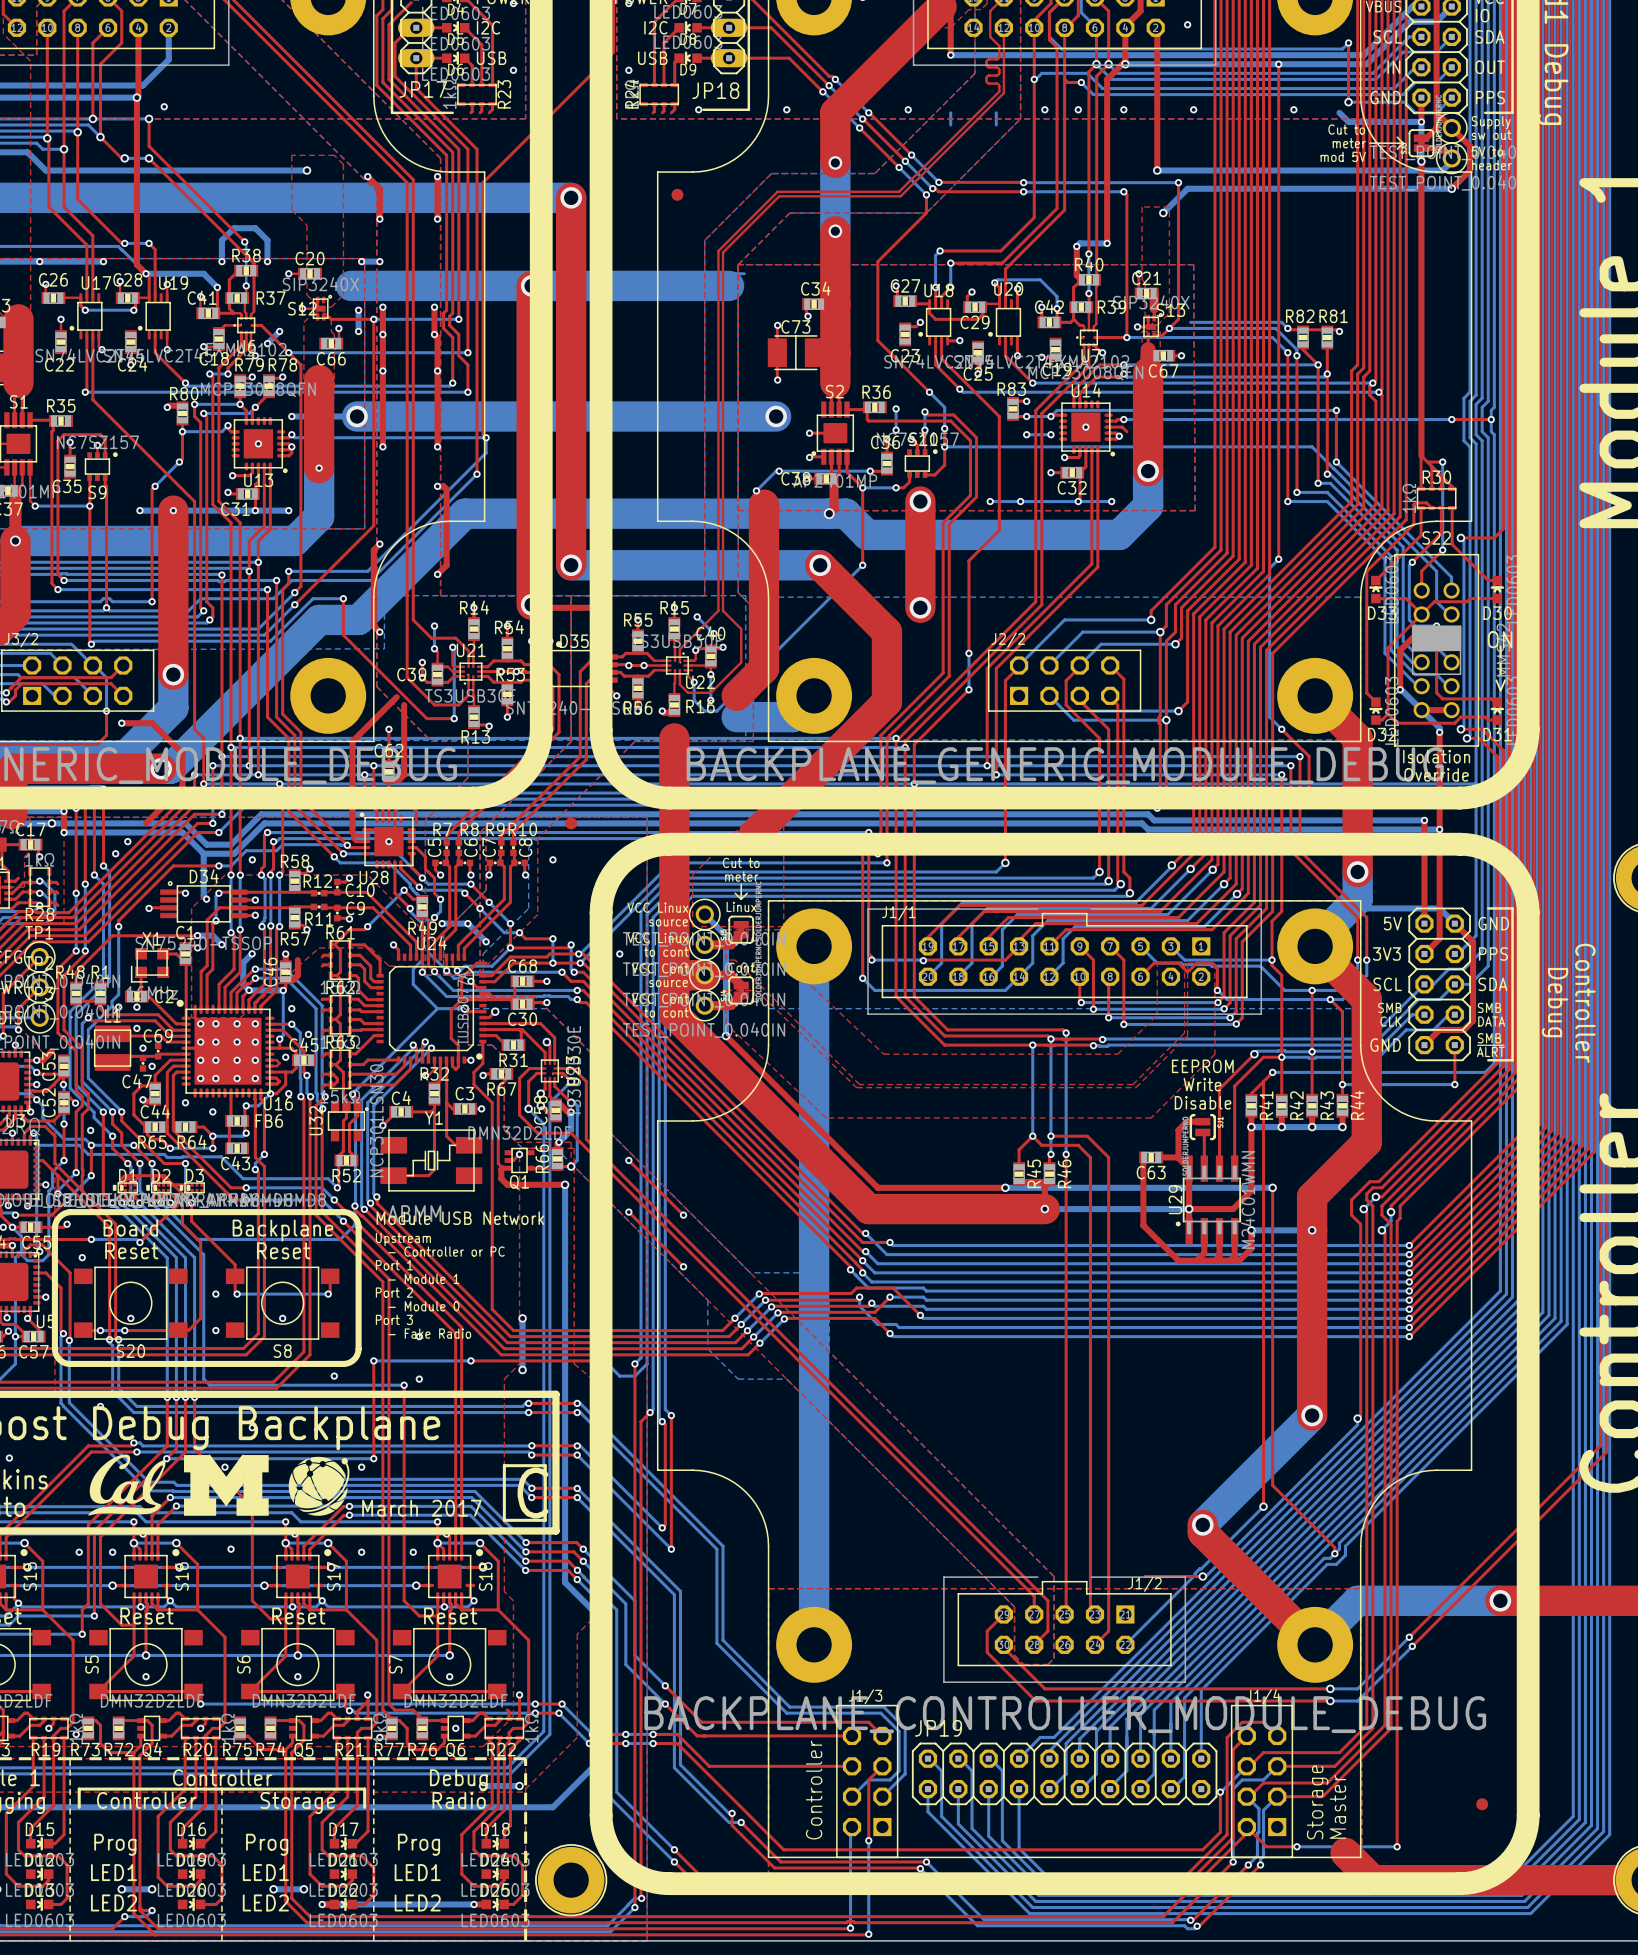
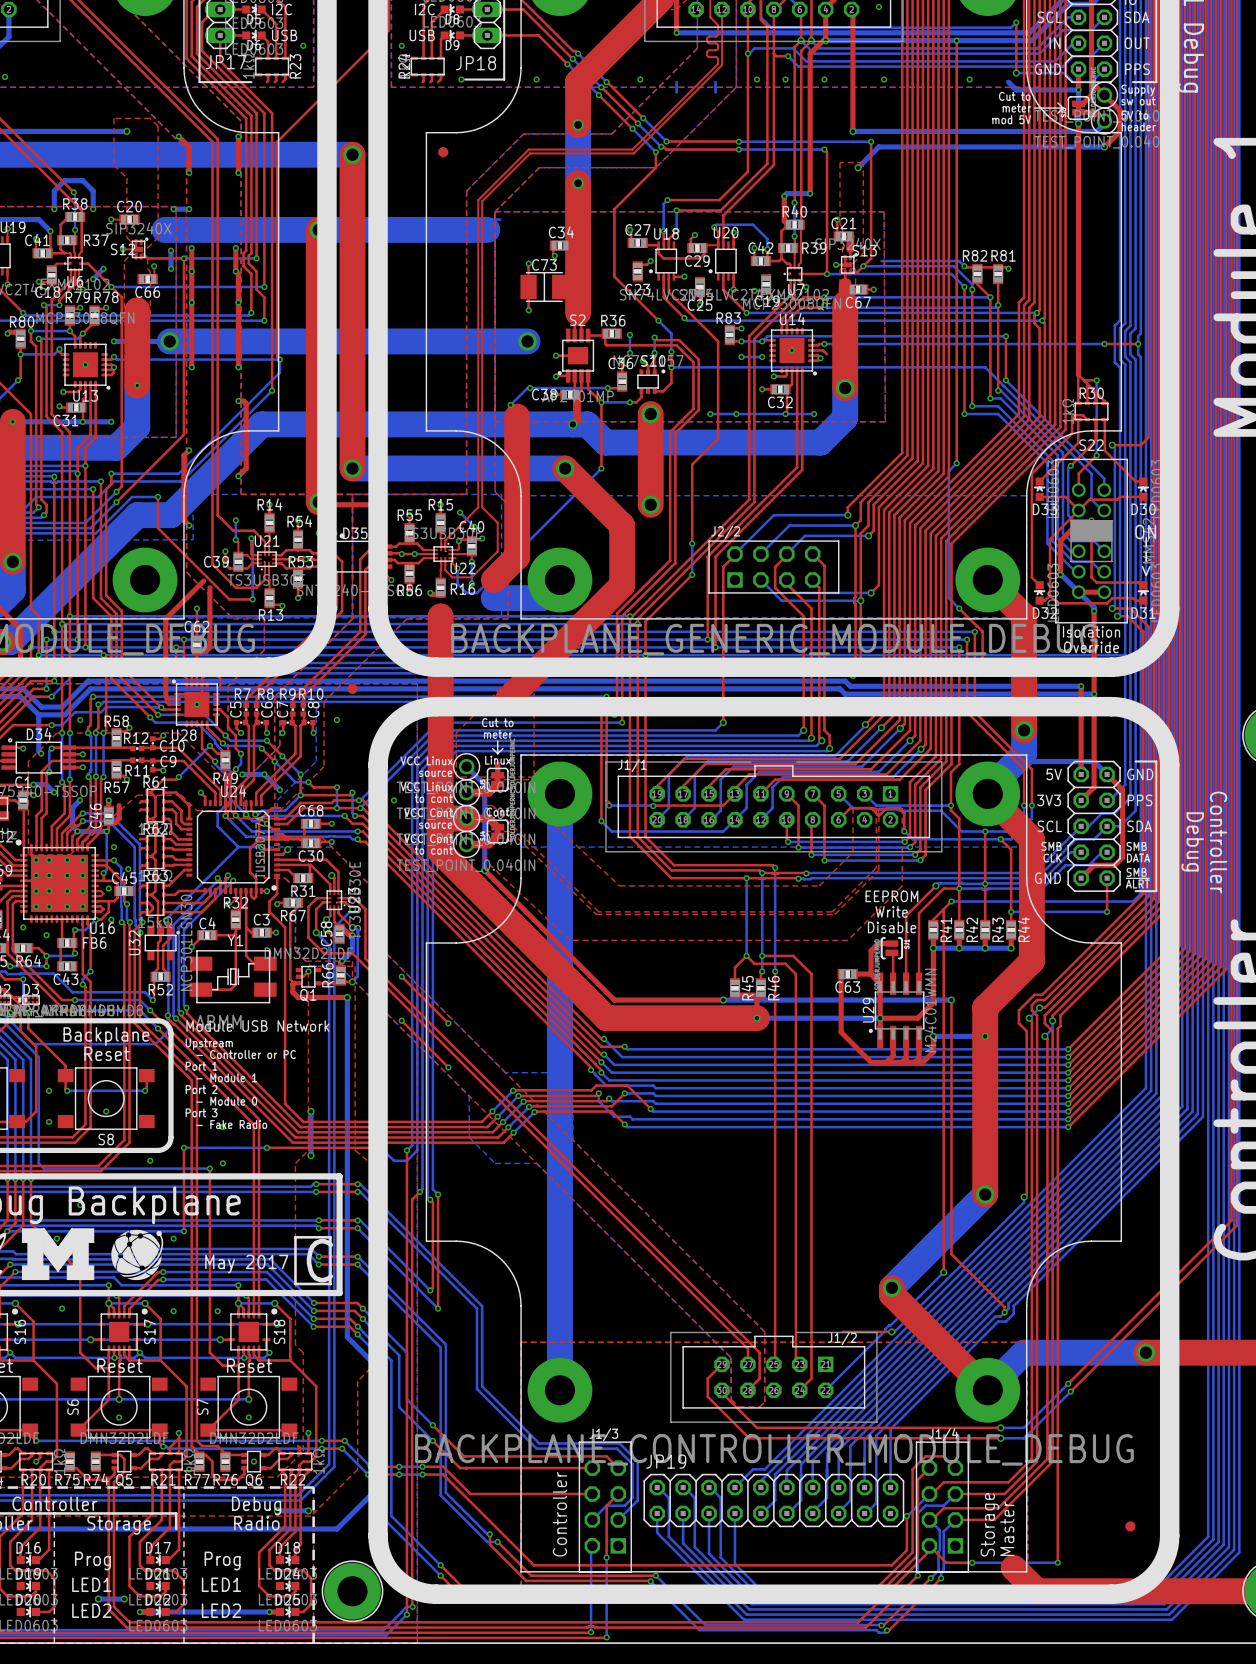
top track: none -> (497, 764) (497, 775)
text: March 2017 (421, 1508) -> May 2017 (246, 1264)

